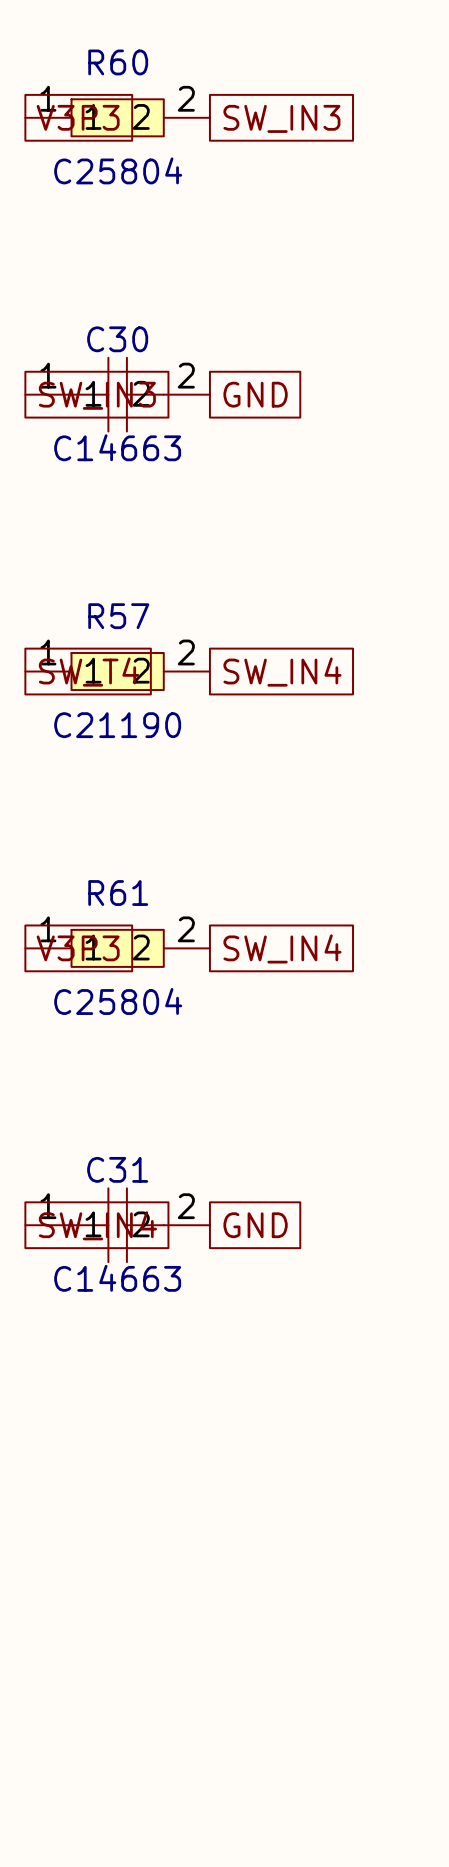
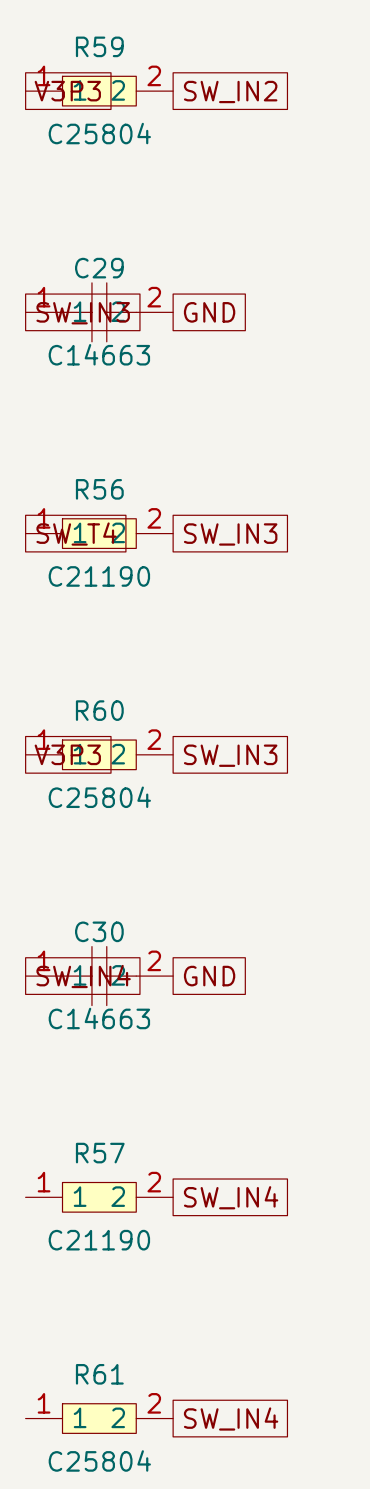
R60 name: R60 (118, 62) -> R59 (99, 46)
global label: SW_IN3 (281, 118) -> SW_IN2 (230, 91)
C30 name: C30 (117, 339) -> C29 (99, 268)
R57 name: R57 (118, 616) -> R56 (99, 489)
global label: SW_IN4 (282, 672) -> SW_IN3 (230, 534)
R61 name: R61 (118, 893) -> R60 (99, 710)
global label: SW_IN4 (282, 948) -> SW_IN3 (230, 755)
C31 name: C31 (117, 1169) -> C30 (99, 931)
R57: none -> C21190 (99, 1197)
global label: none -> SW_IN4 (231, 1197)
R61: none -> C25804 (99, 1418)
global label: none -> SW_IN4 (231, 1418)

